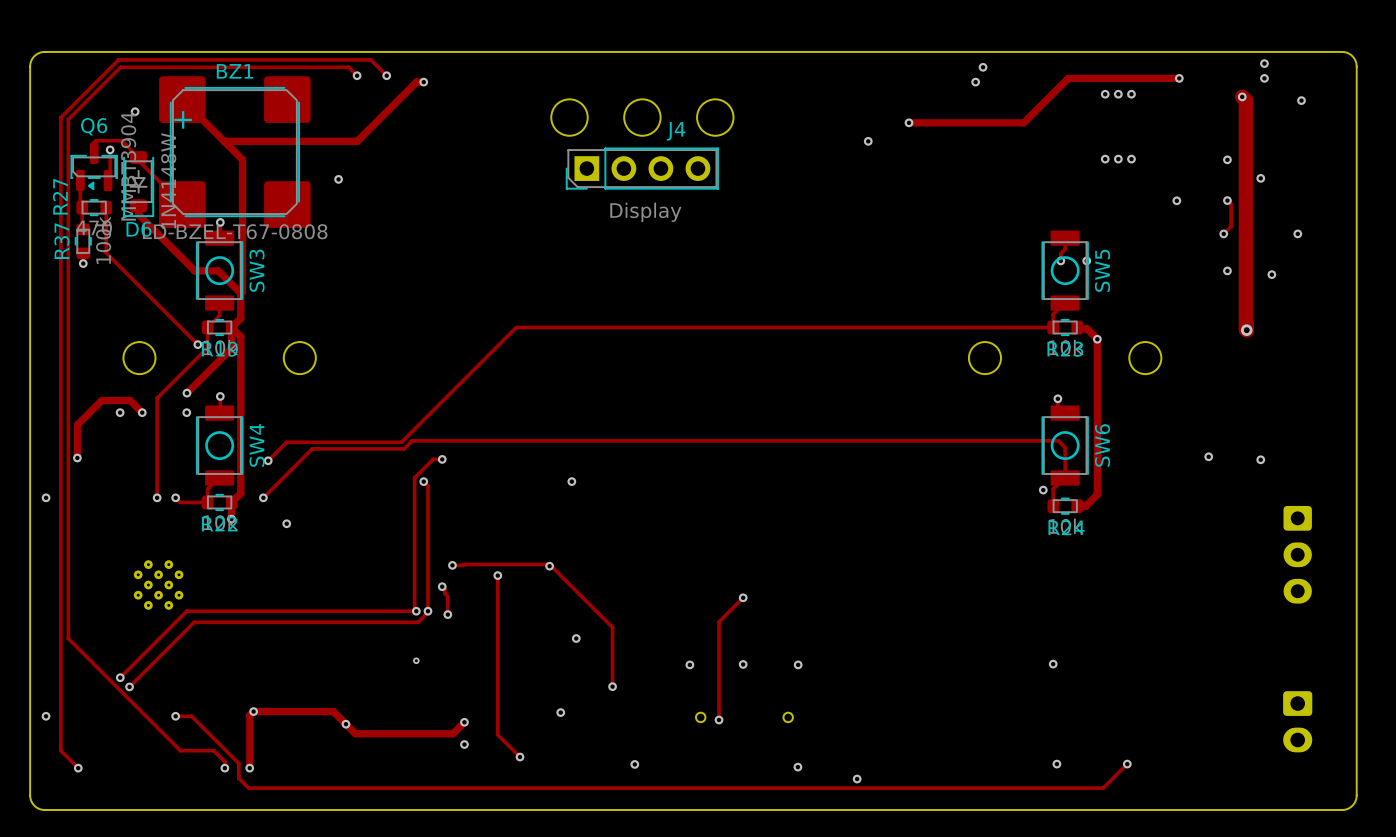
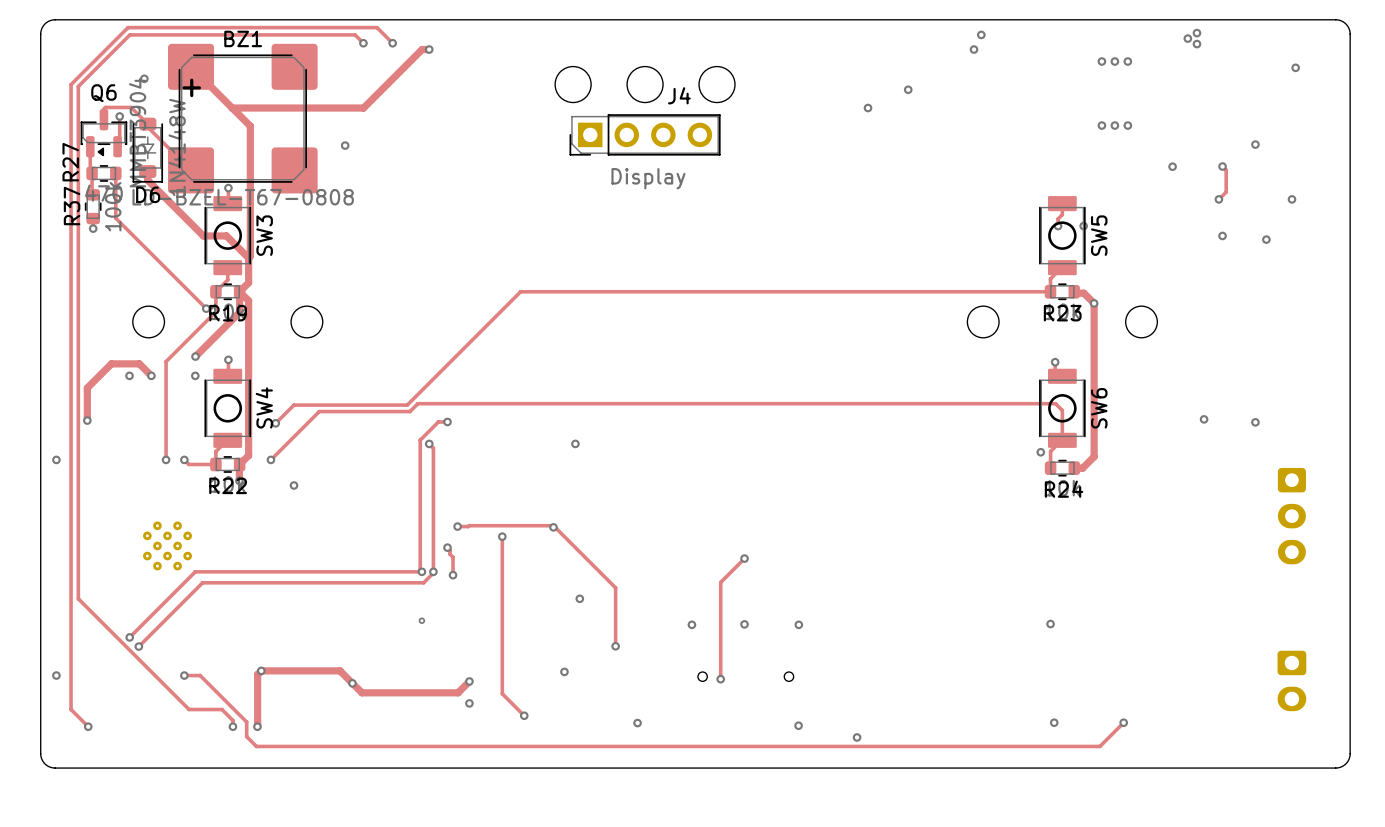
via: (1264, 63) -> none
via: none -> (1196, 33)
via: none -> (1187, 38)
via: none -> (1196, 44)
track: (1179, 78) (1068, 78) (1023, 122) (909, 122) -> none
via: (1179, 78) -> none
via: (1264, 78) -> none
track: (1242, 96) (1245, 100) (1246, 330) (1246, 325) -> none
via: (1242, 96) -> none
via: (1227, 159) -> none
via: (1246, 330) -> none

